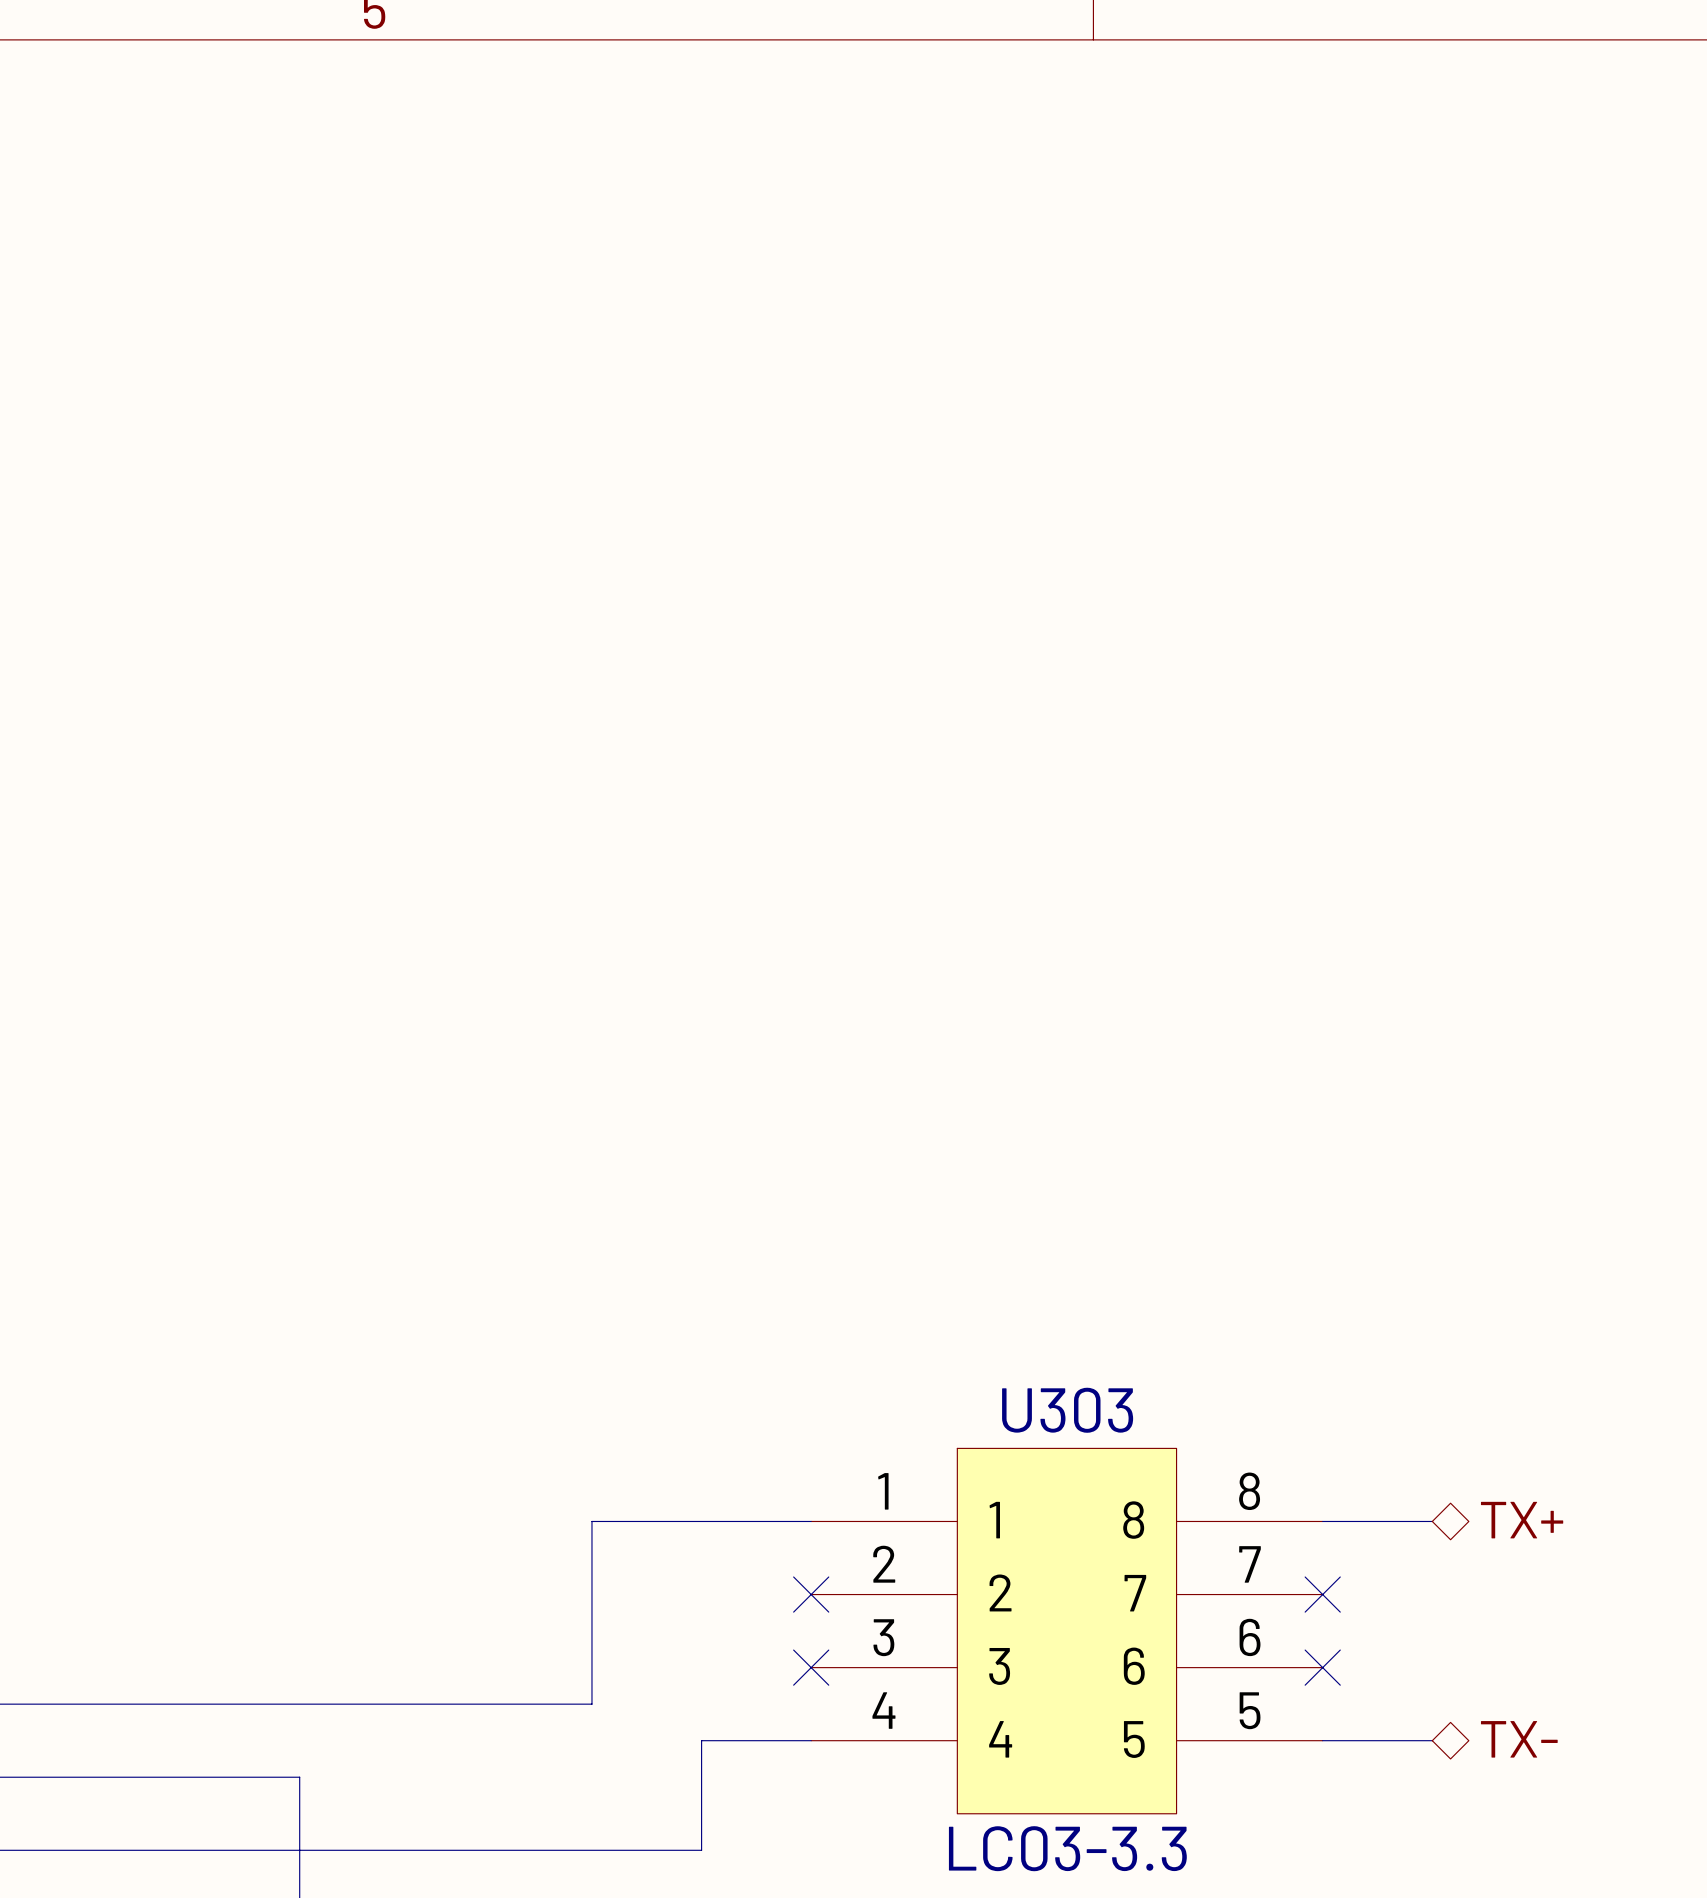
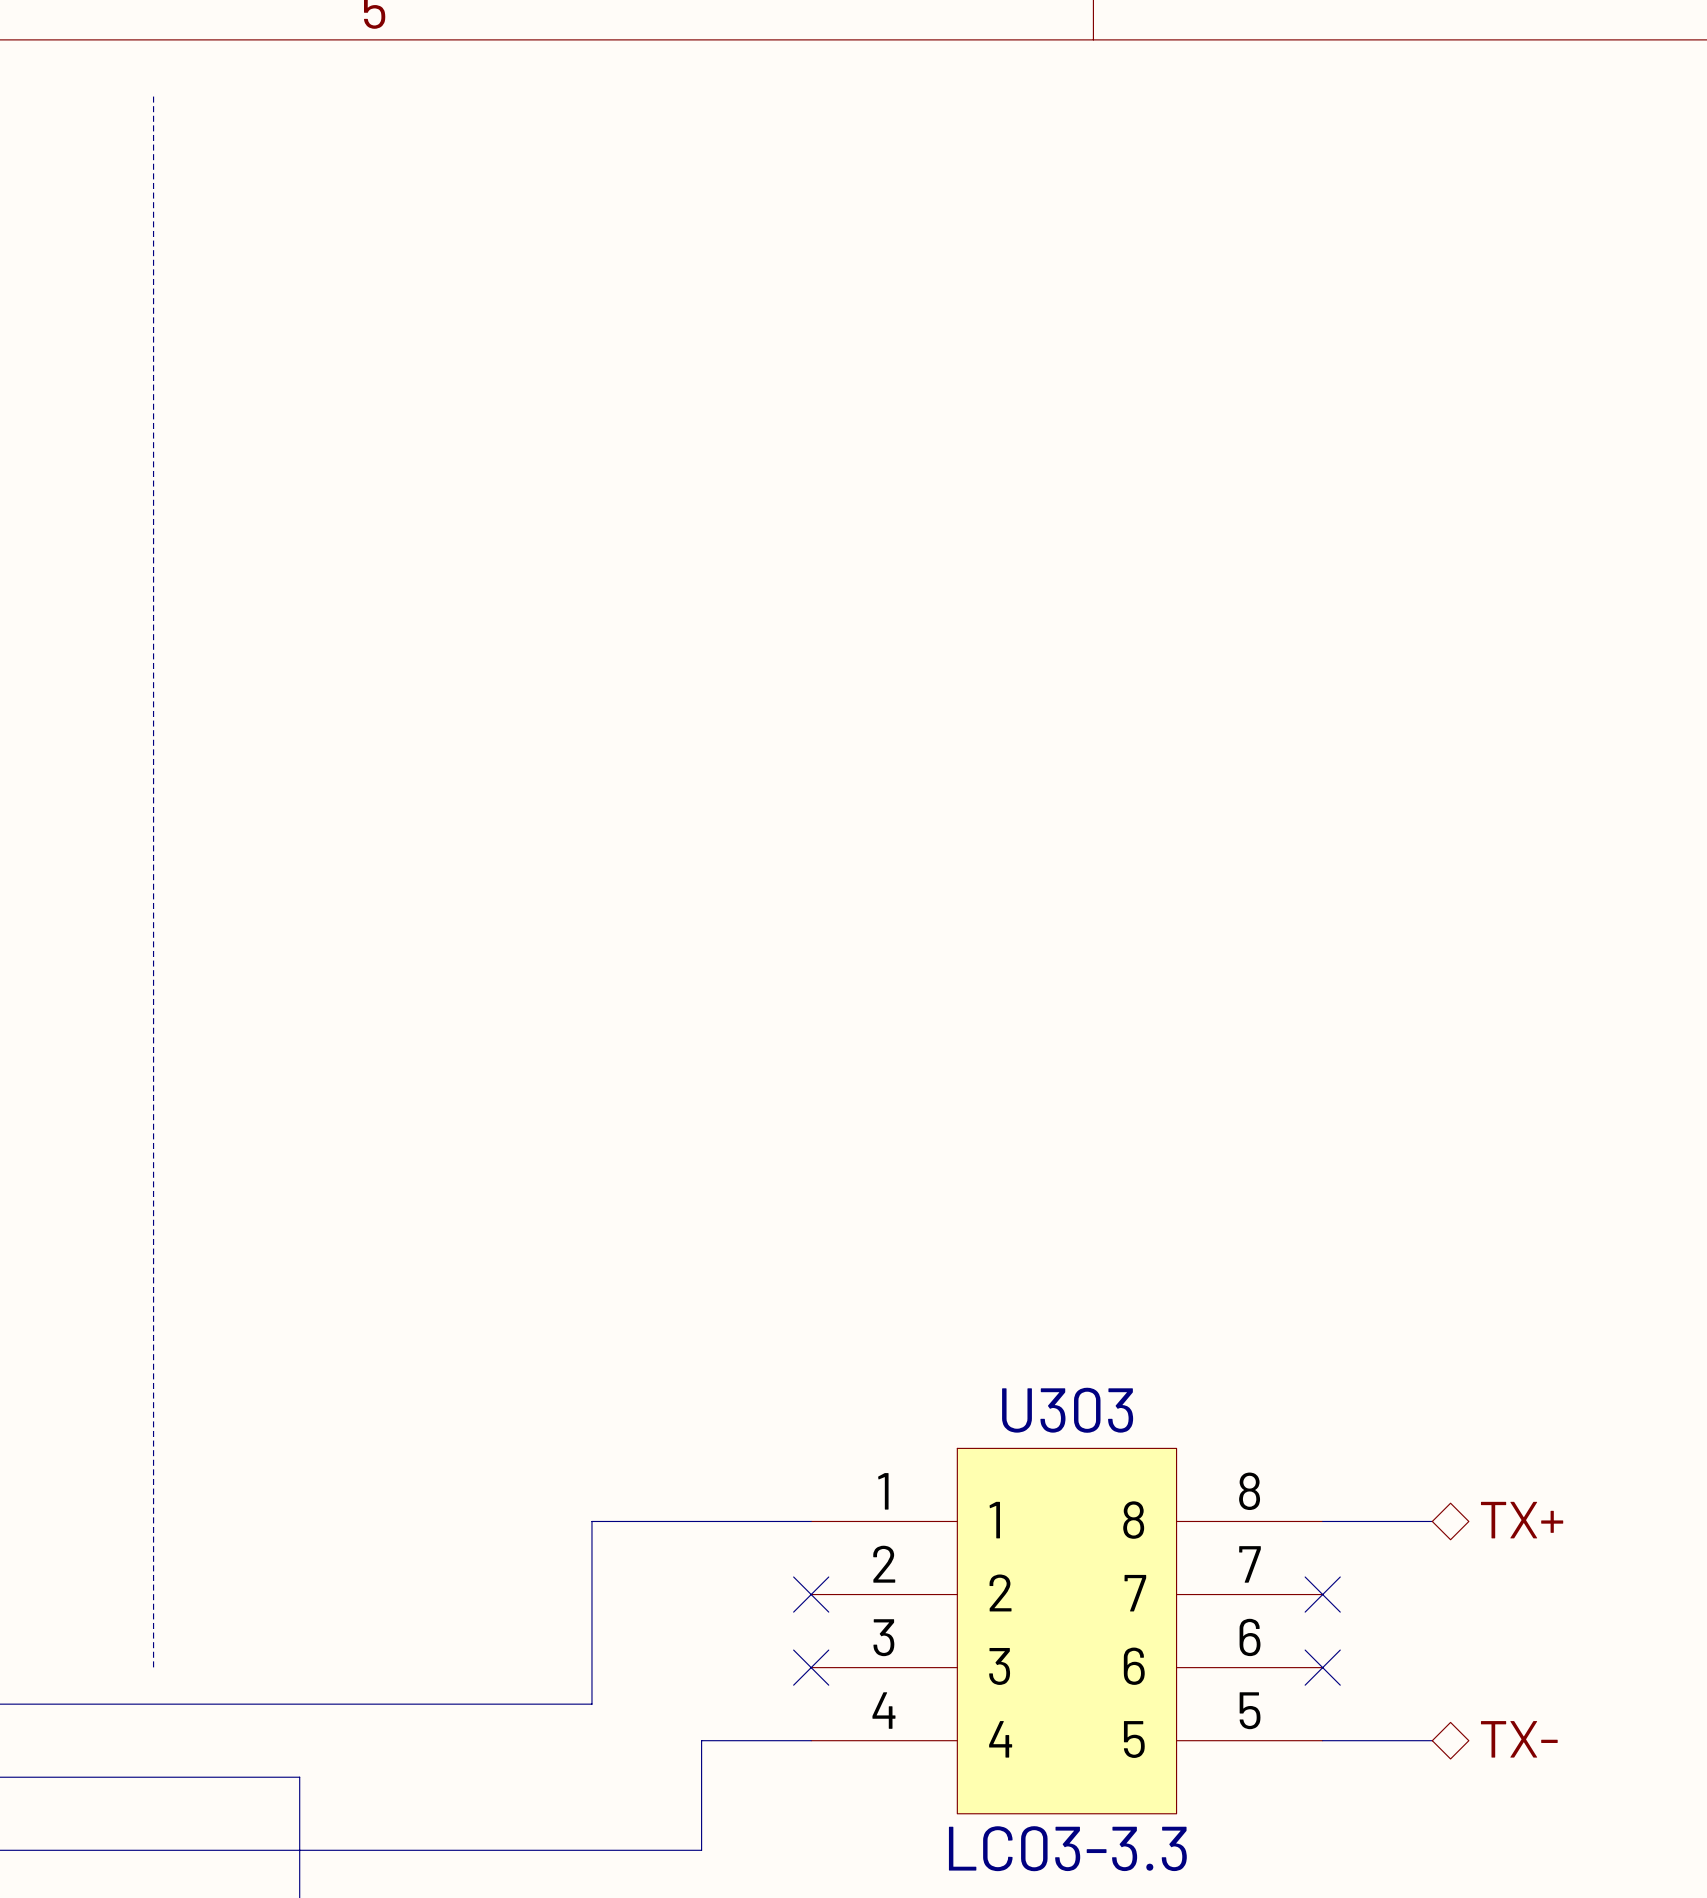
line: none -> (153, 96) (153, 1667)

